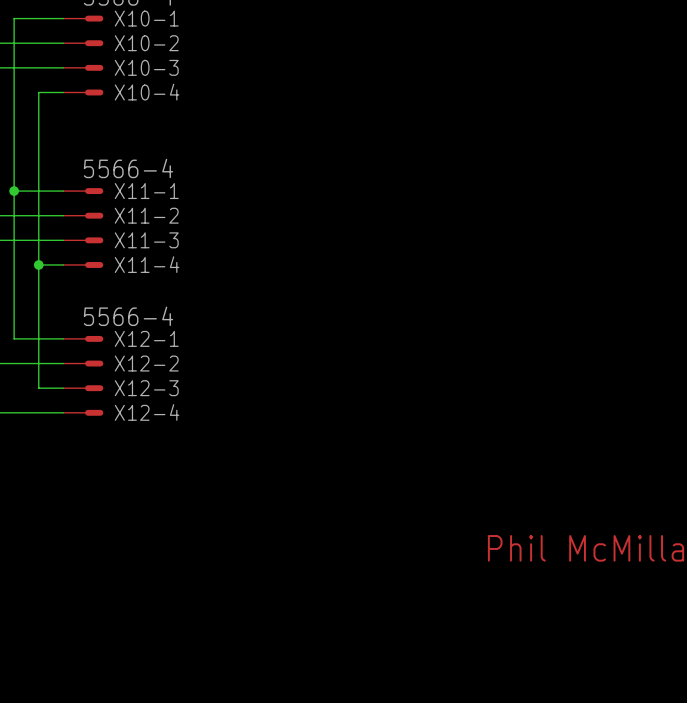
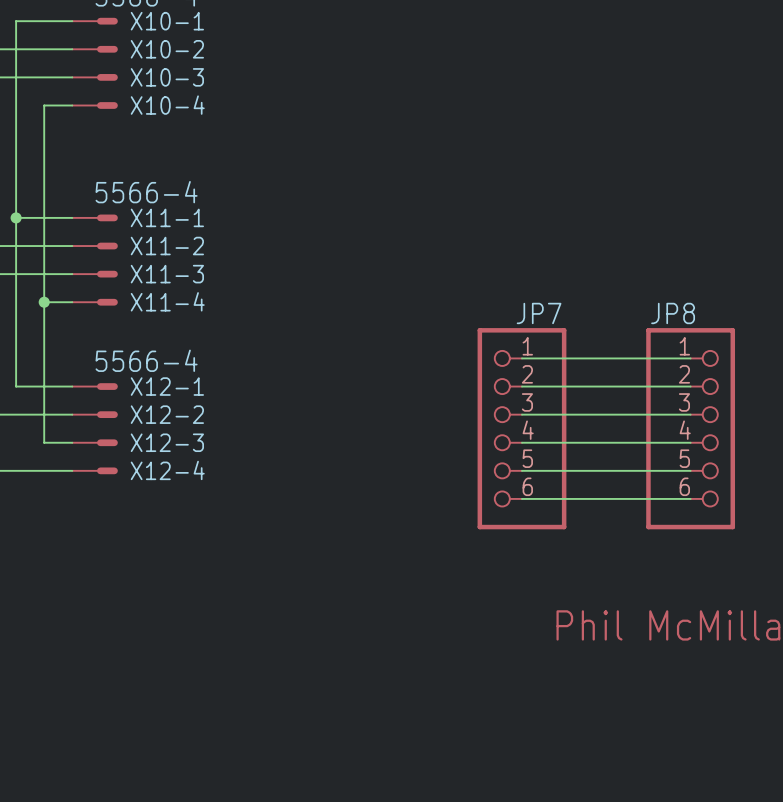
wire: none -> (521, 358) (690, 358)
wire: none -> (521, 386) (690, 386)
wire: none -> (521, 414) (690, 414)
JP7: none -> (521, 428)
JP8: none -> (690, 428)
wire: none -> (521, 442) (690, 442)
wire: none -> (521, 470) (690, 470)
wire: none -> (521, 498) (690, 498)

